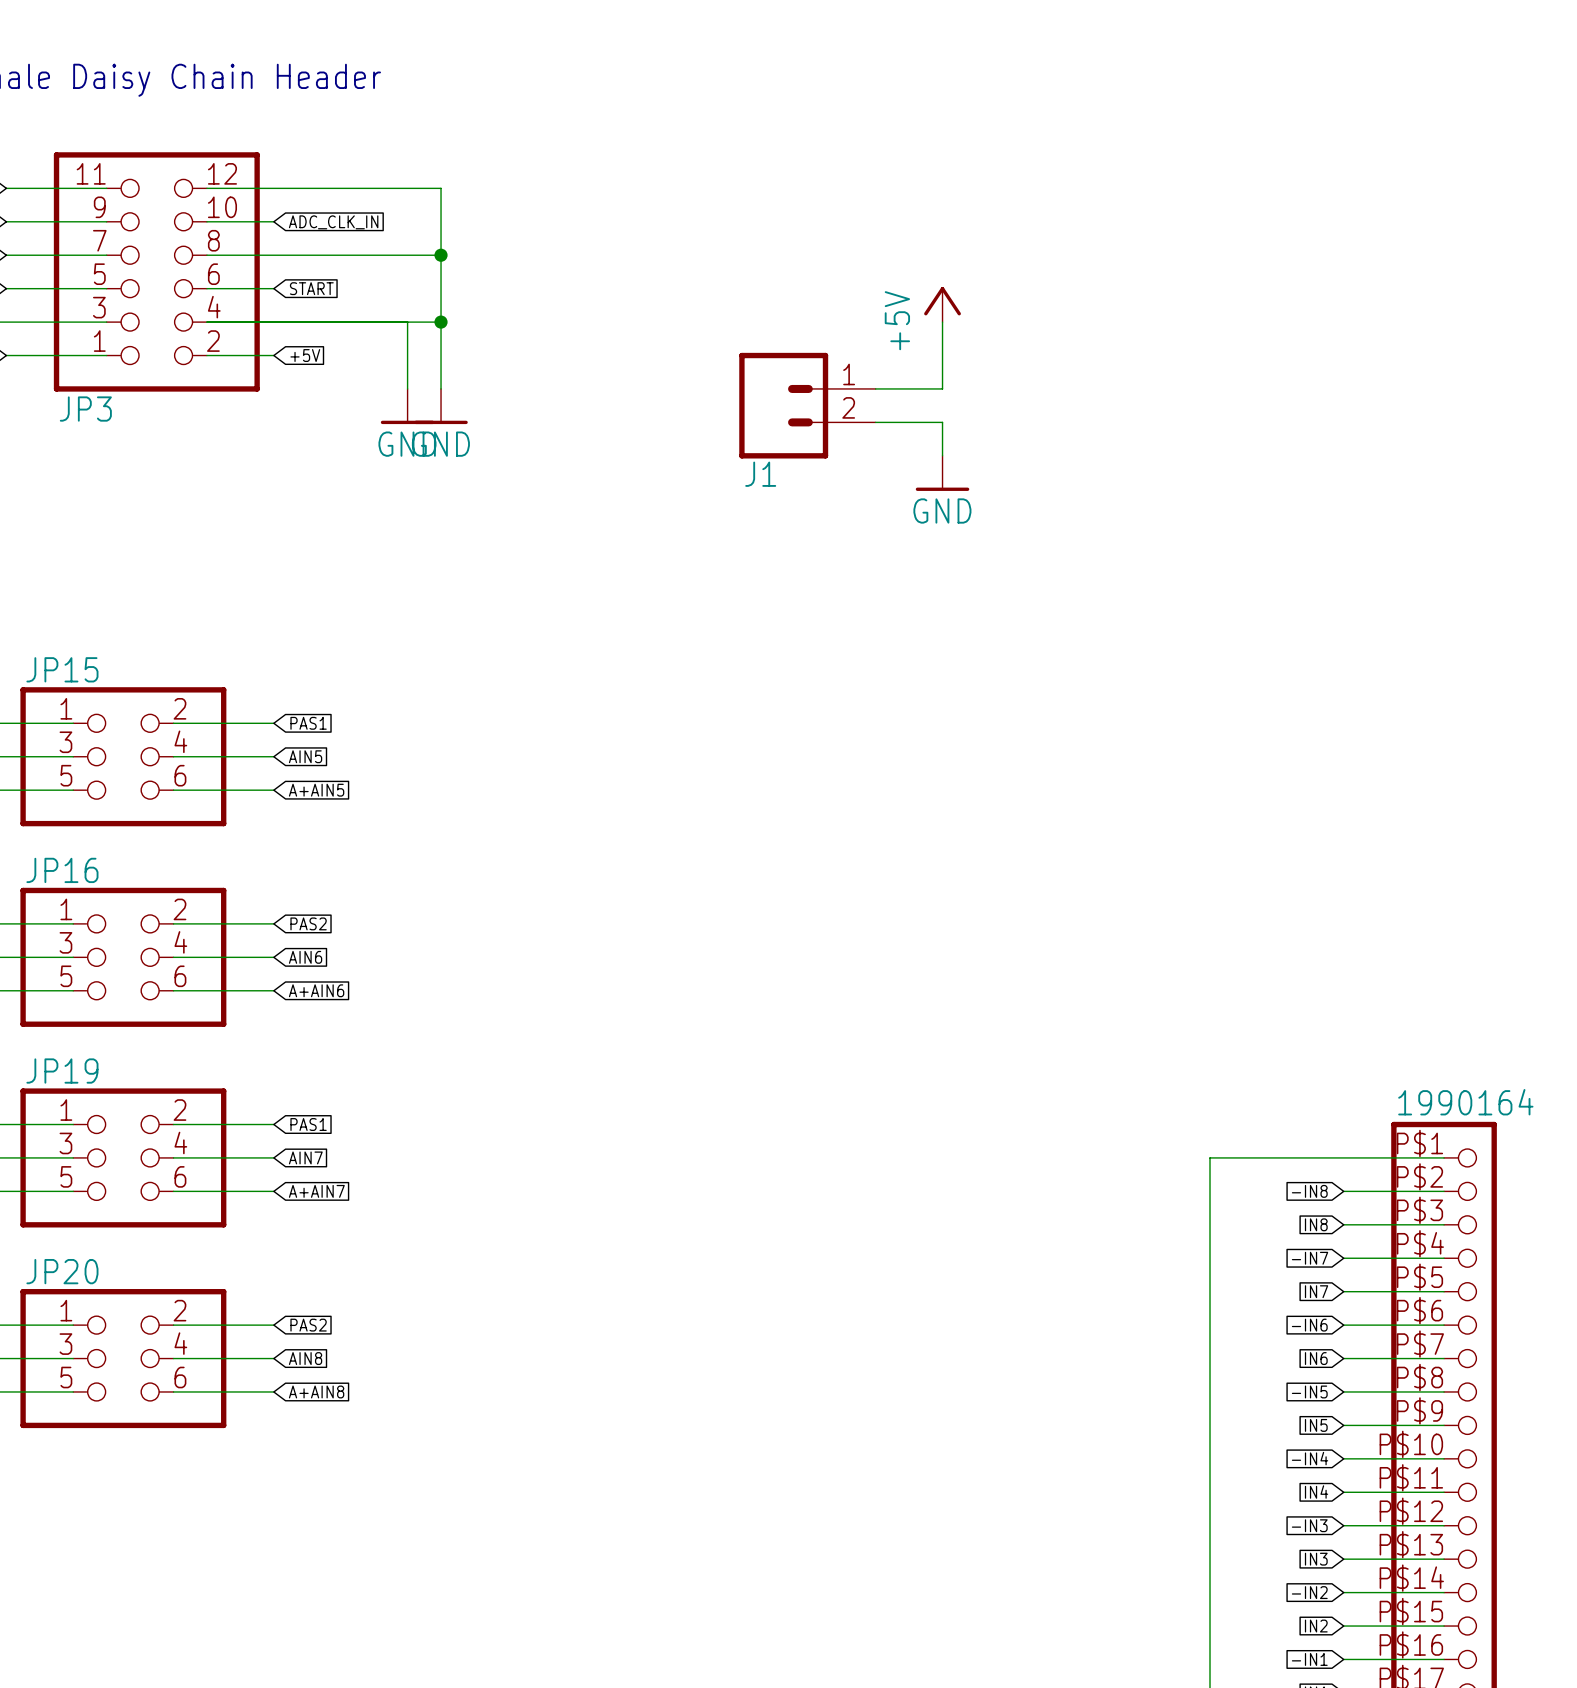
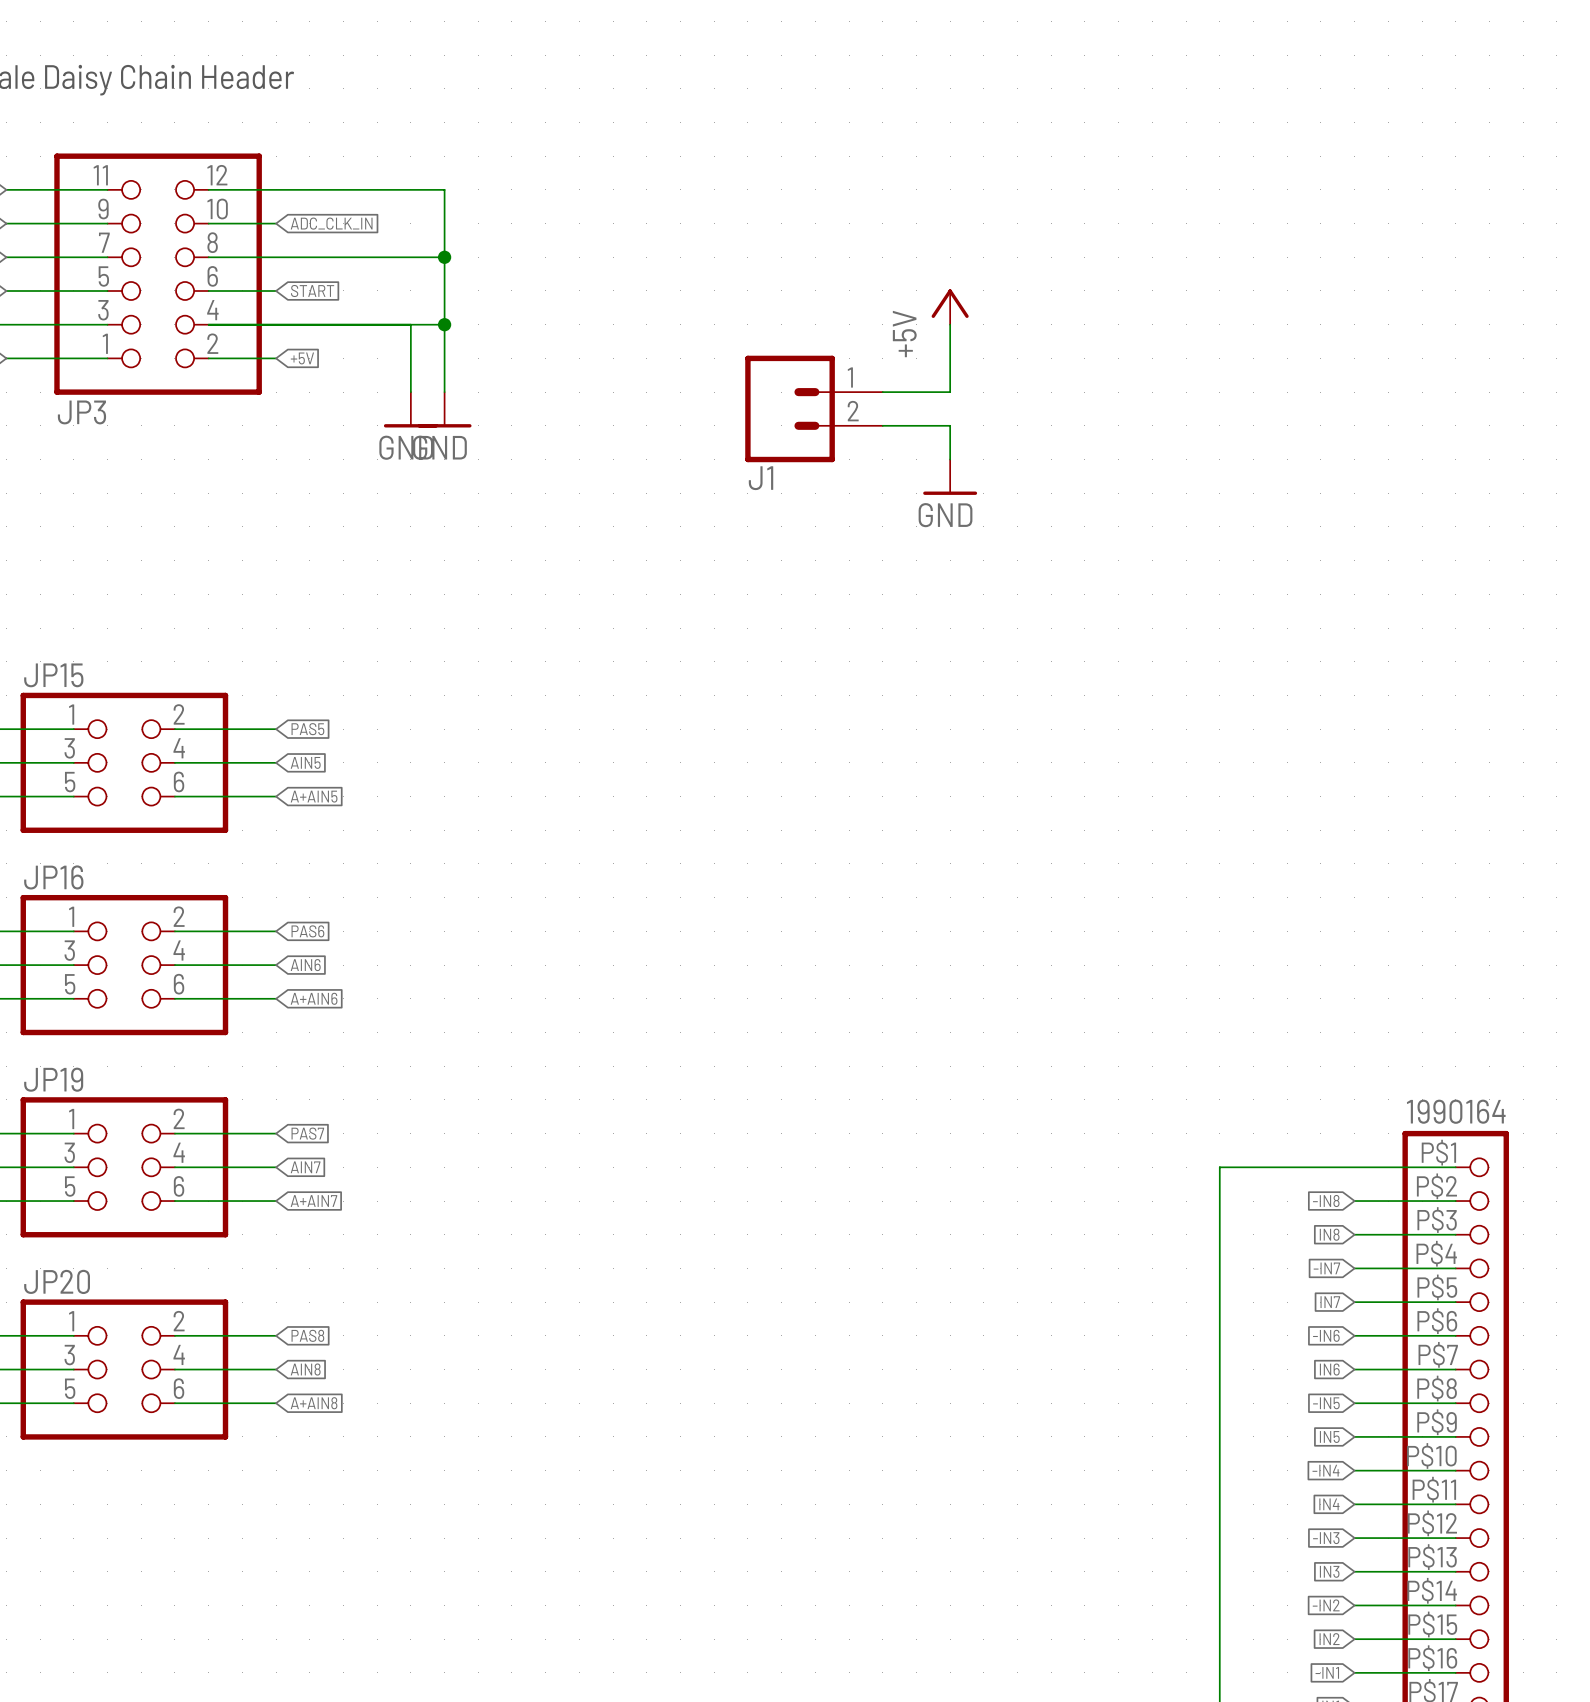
global label: PAS1 (308, 723) -> PAS5 (307, 729)
global label: PAS2 (308, 923) -> PAS6 (307, 931)
global label: PAS1 (308, 1124) -> PAS7 (307, 1133)
global label: PAS2 (308, 1325) -> PAS8 (307, 1335)

